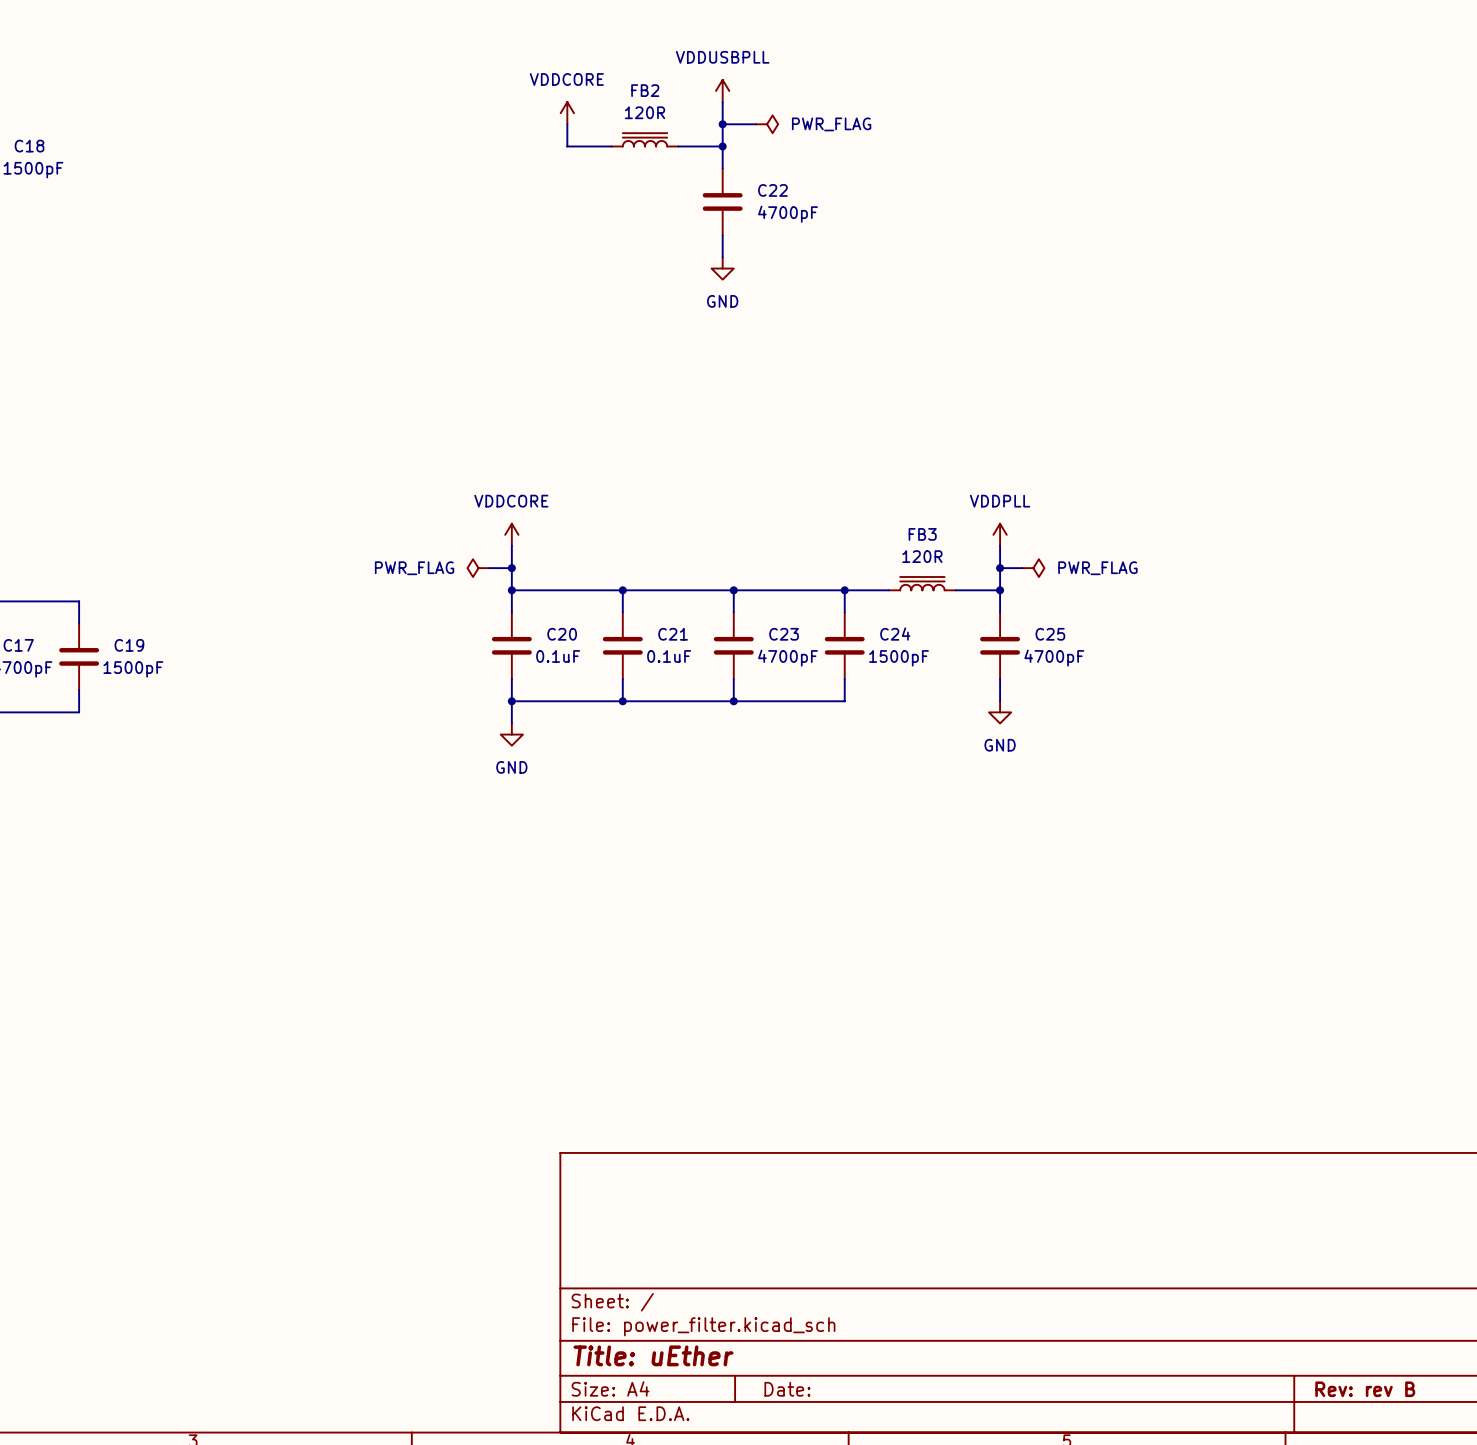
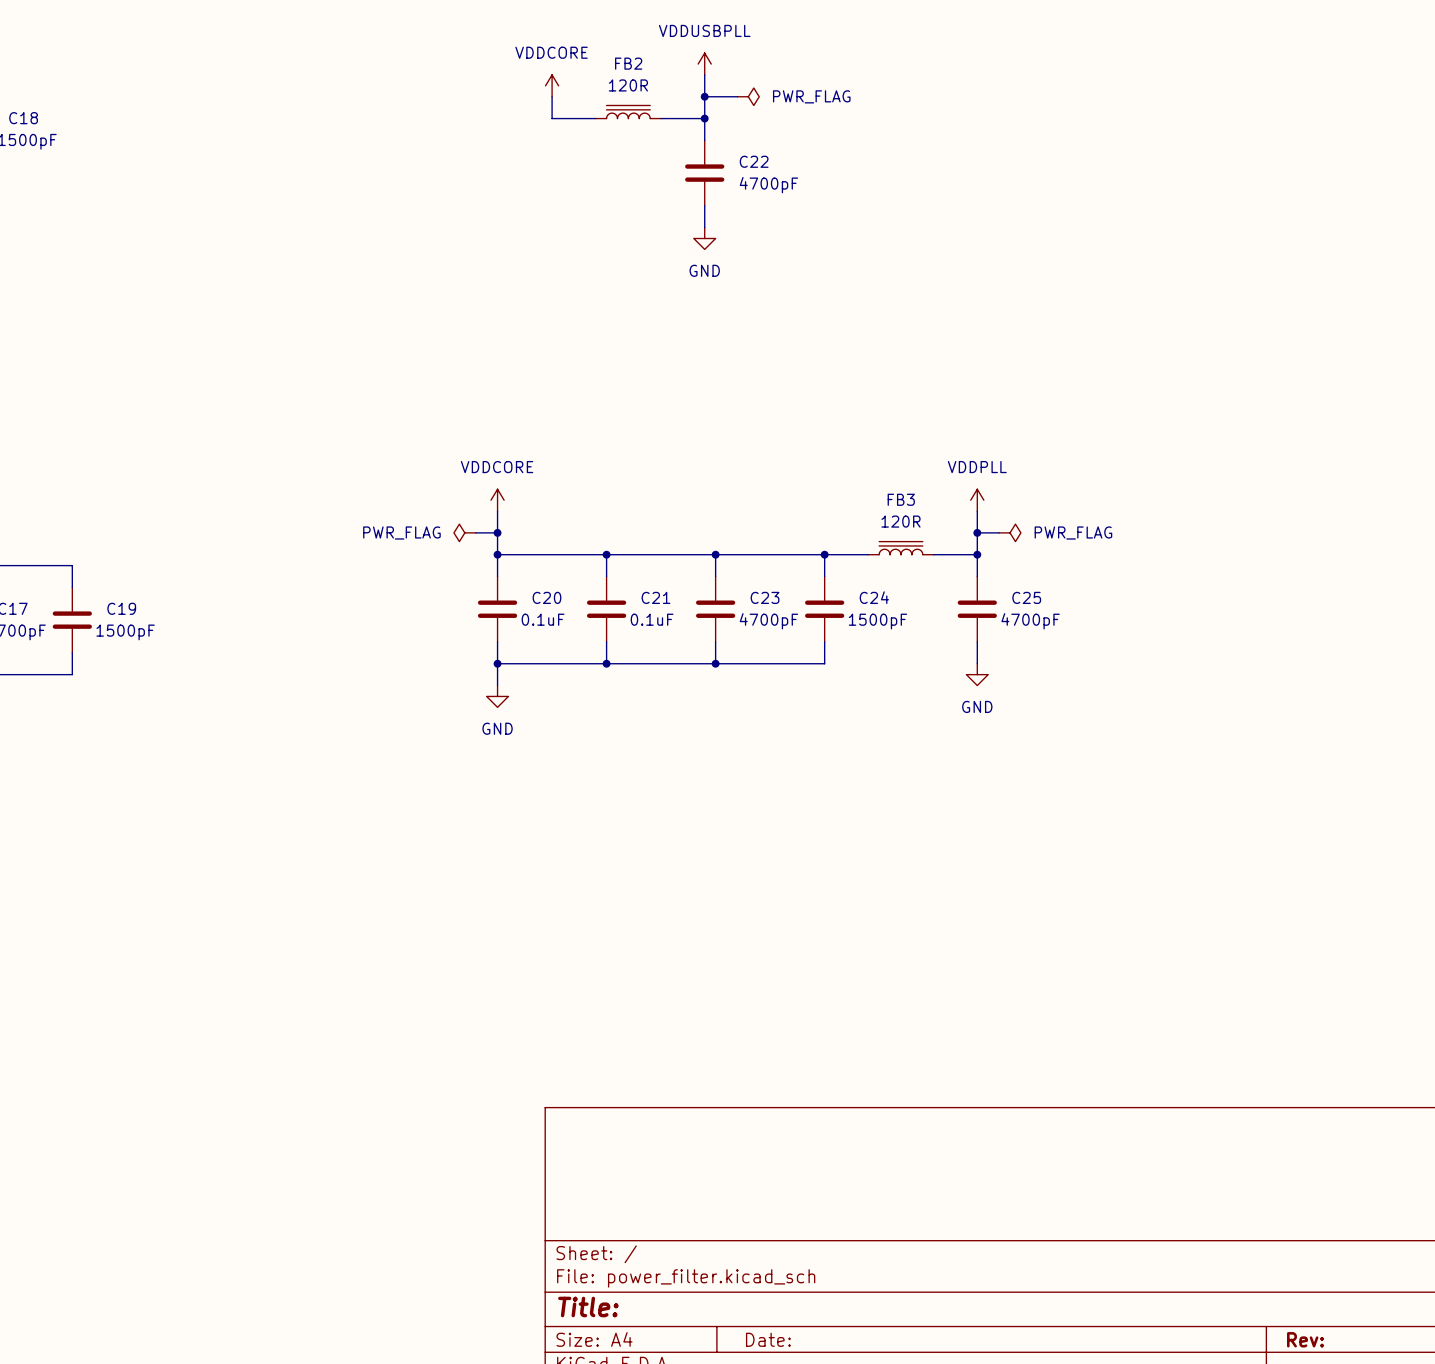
title block: Title: uEther (653, 1355) -> Title: (588, 1307)
title block: Rev: rev B (1365, 1389) -> Rev: (1305, 1339)

